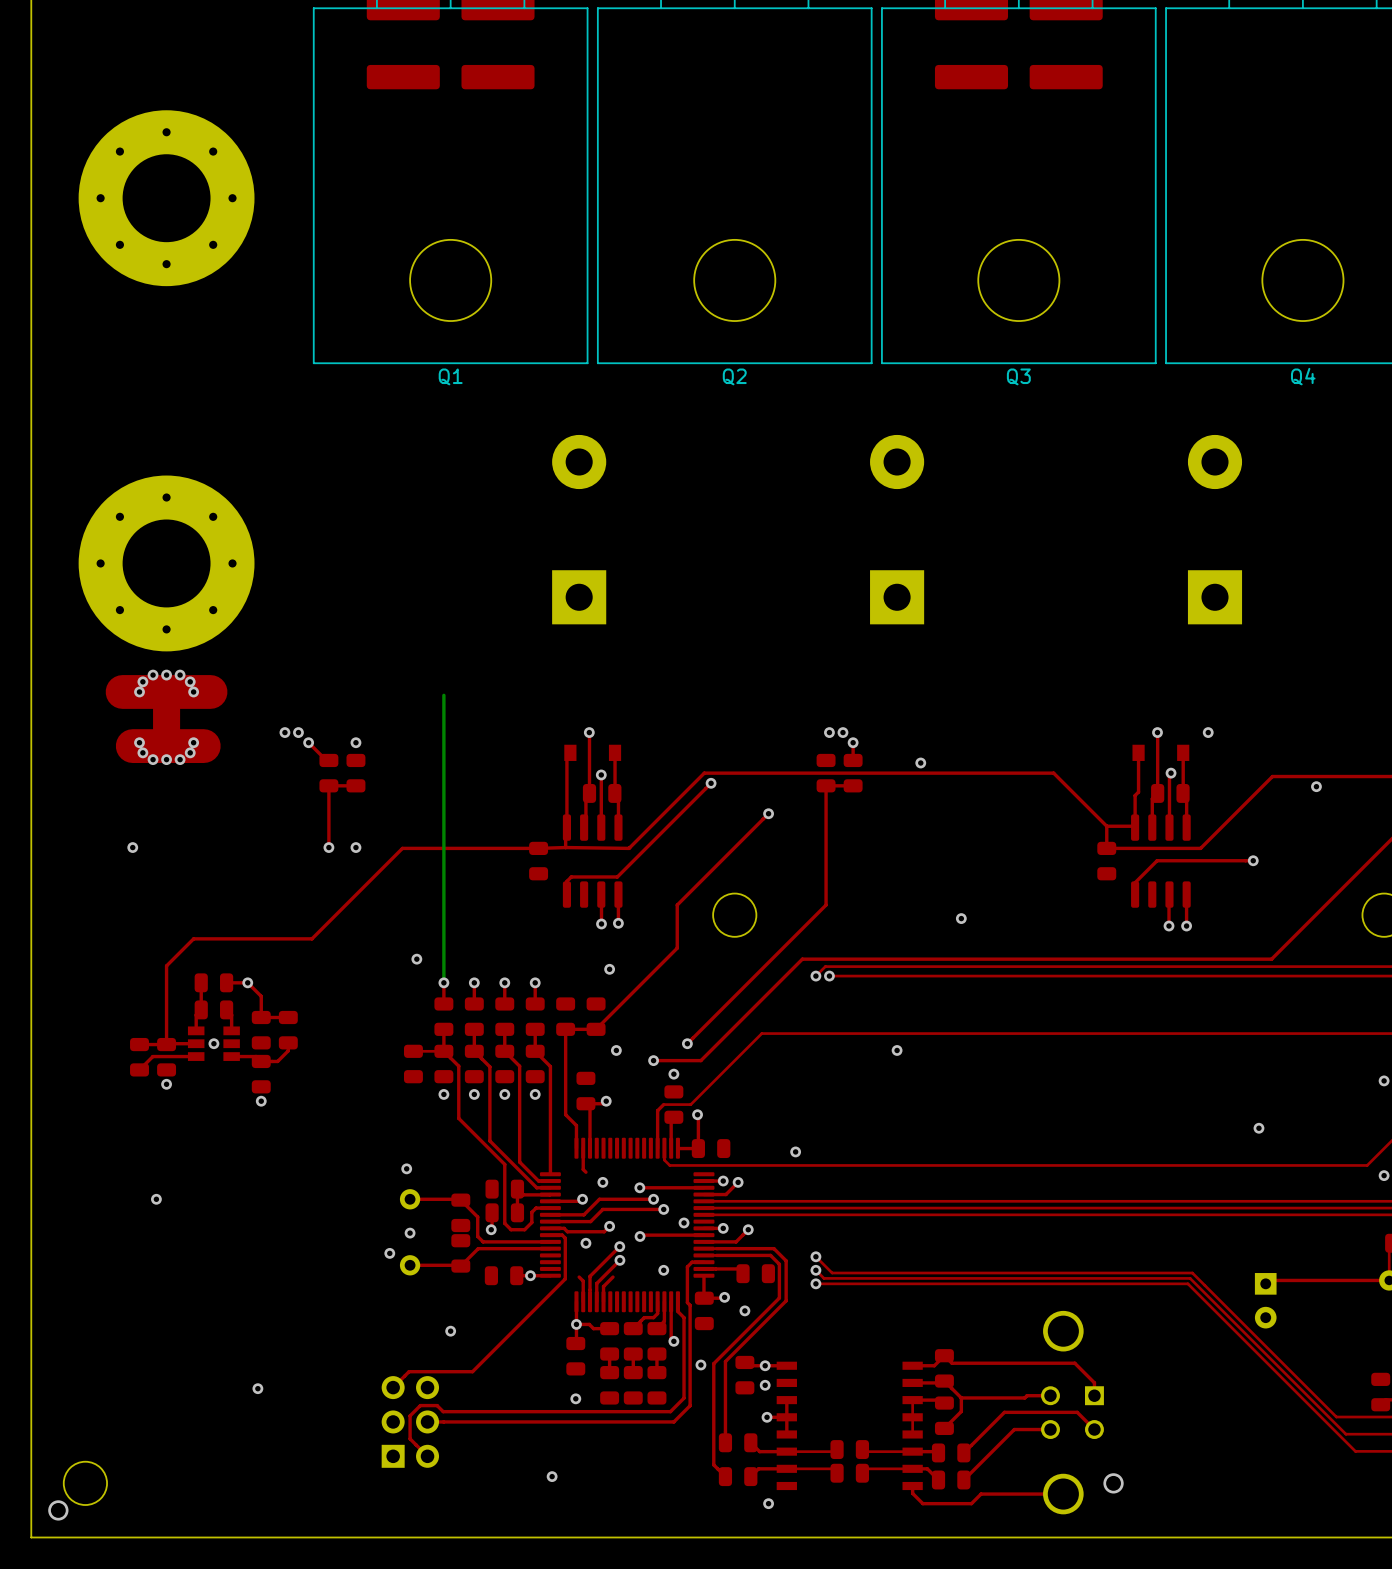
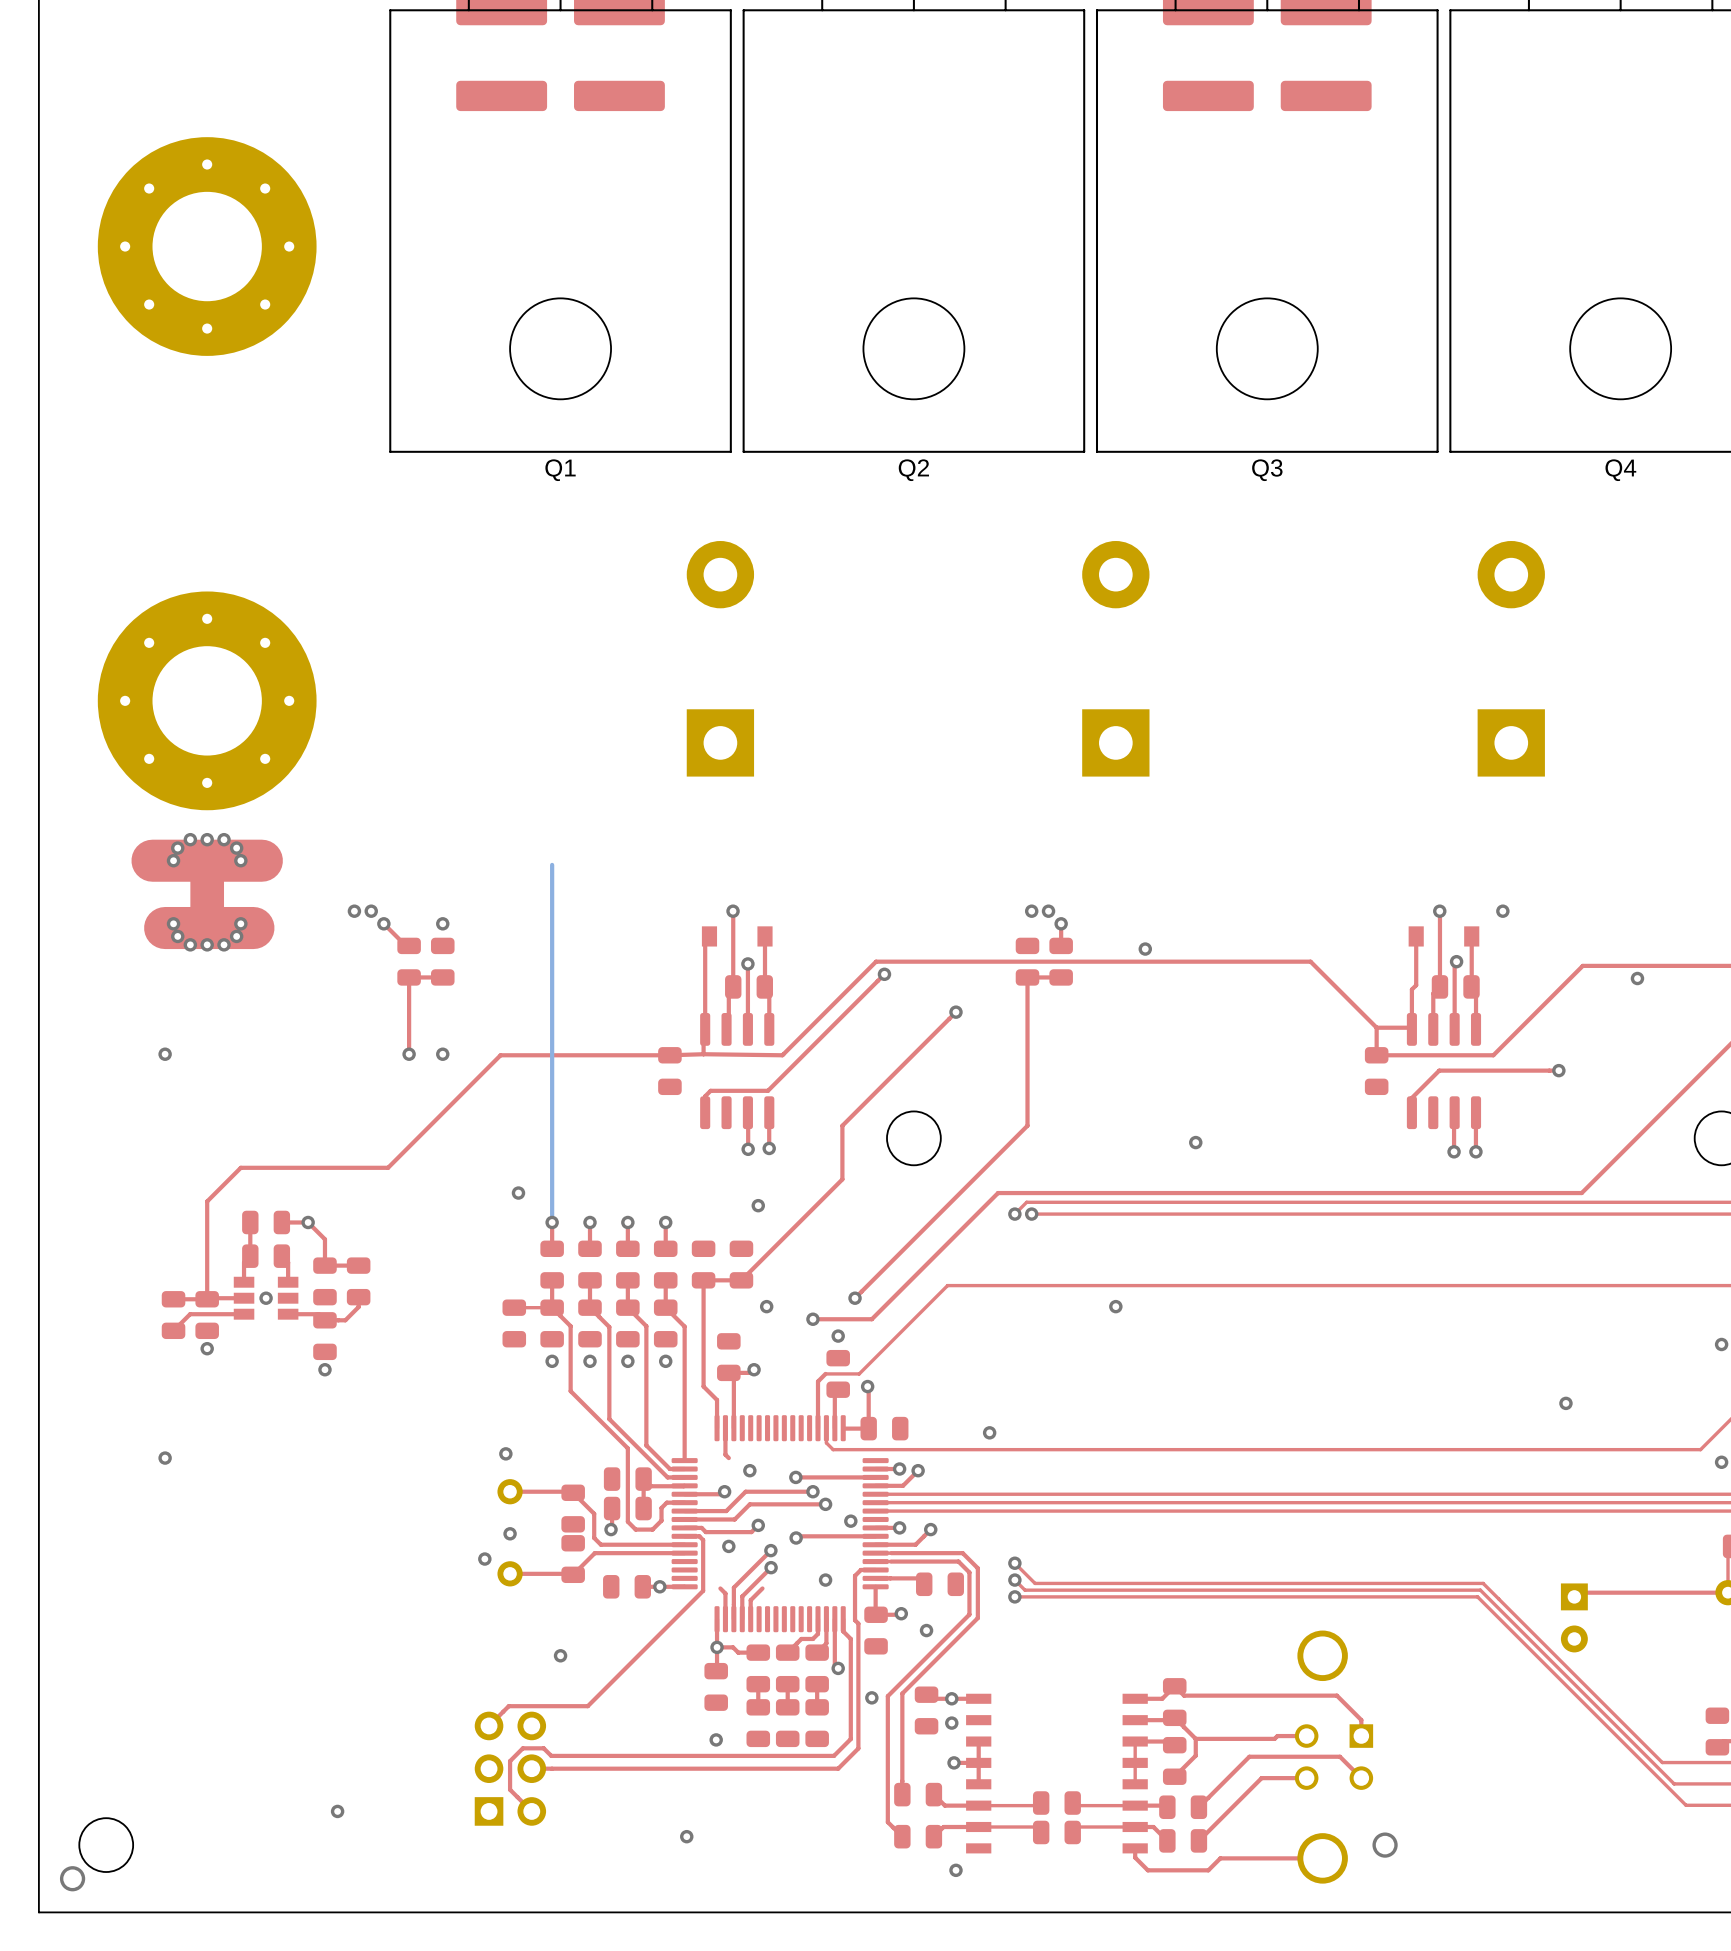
via position: (156, 1199) -> (165, 1458)
via position: (257, 1388) -> (337, 1811)

